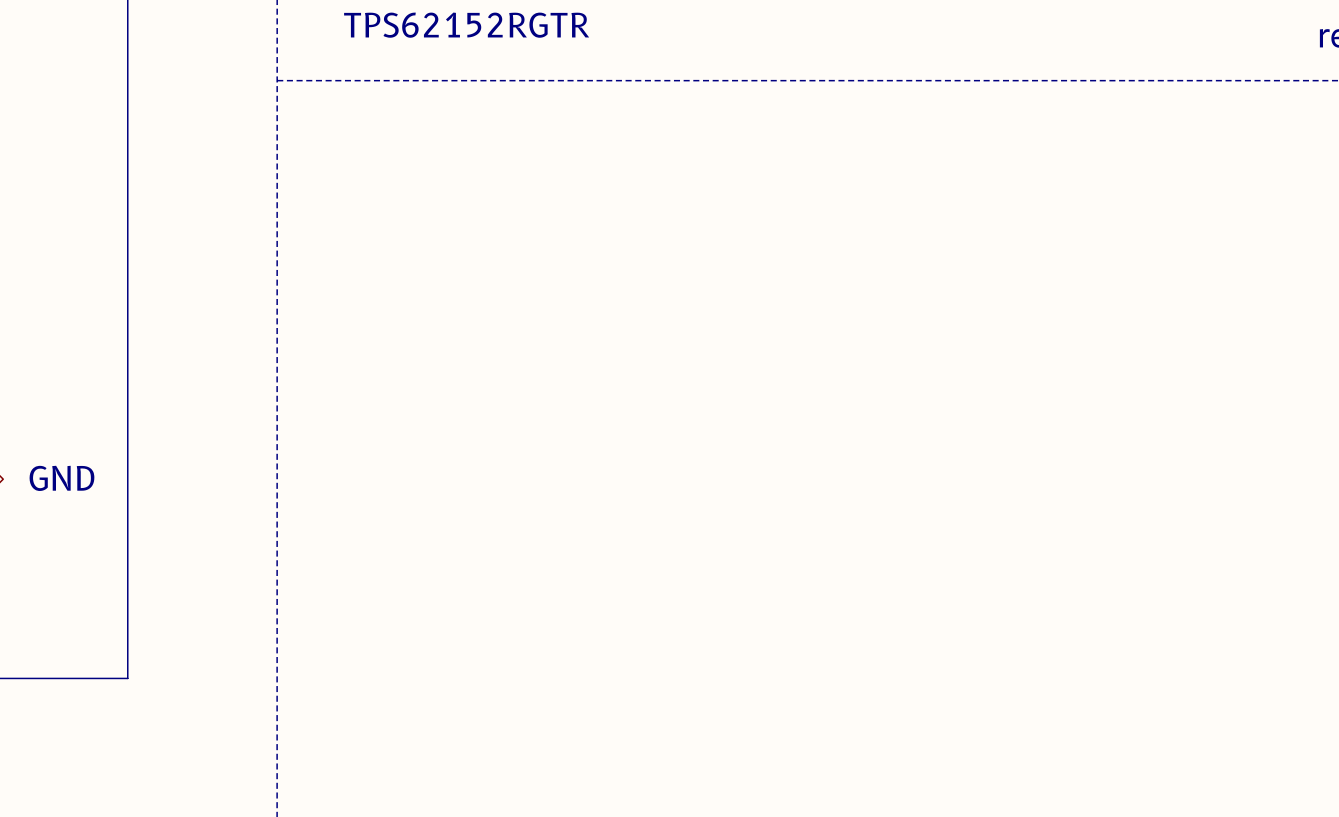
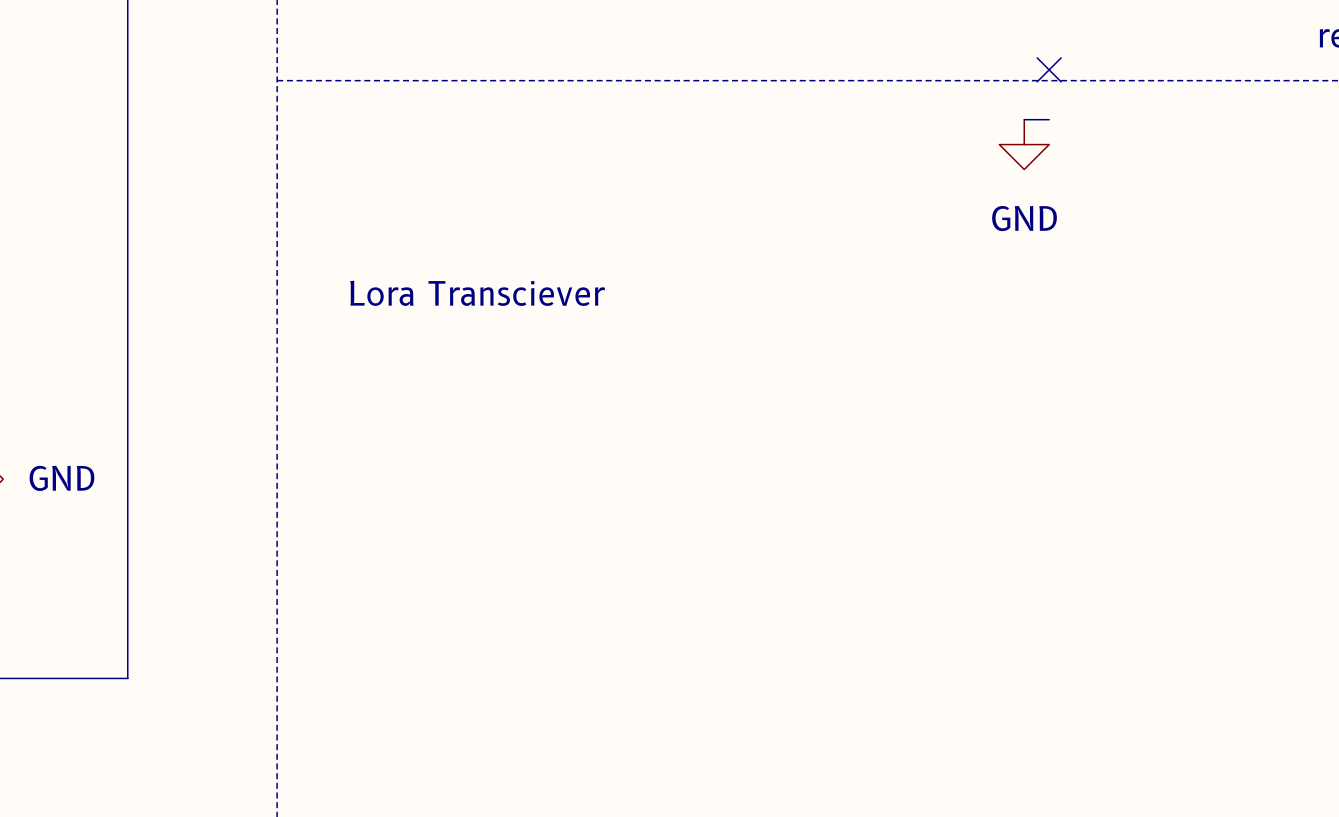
text: TPS62152RGTR (466, 25) -> none
no-connect mark: none -> (1049, 69)
wire: none -> (1024, 119) (1049, 119)
power symbol: none -> GND (1024, 144)
text: none -> Lora Transciever (477, 293)

